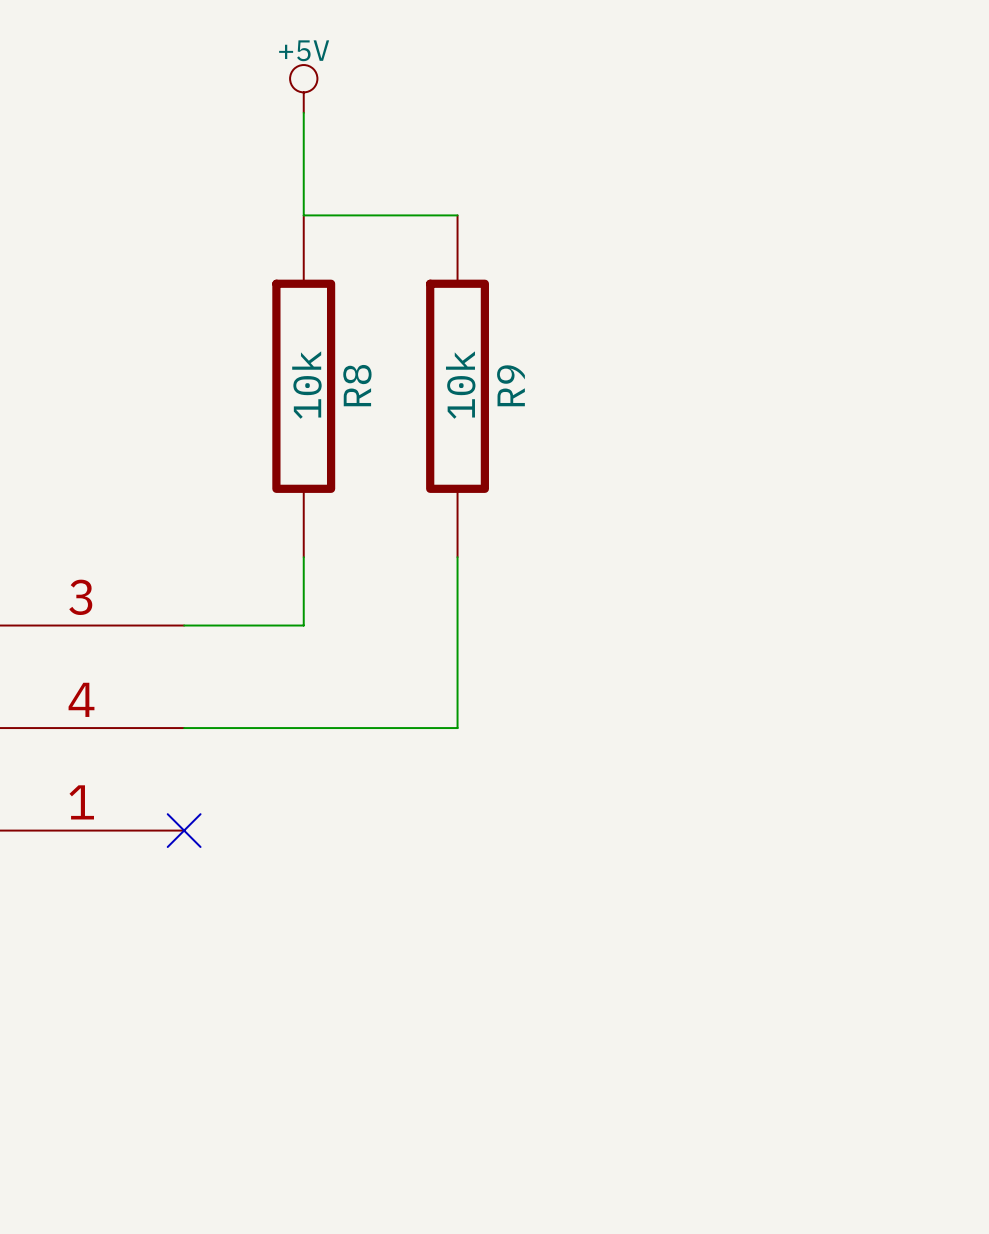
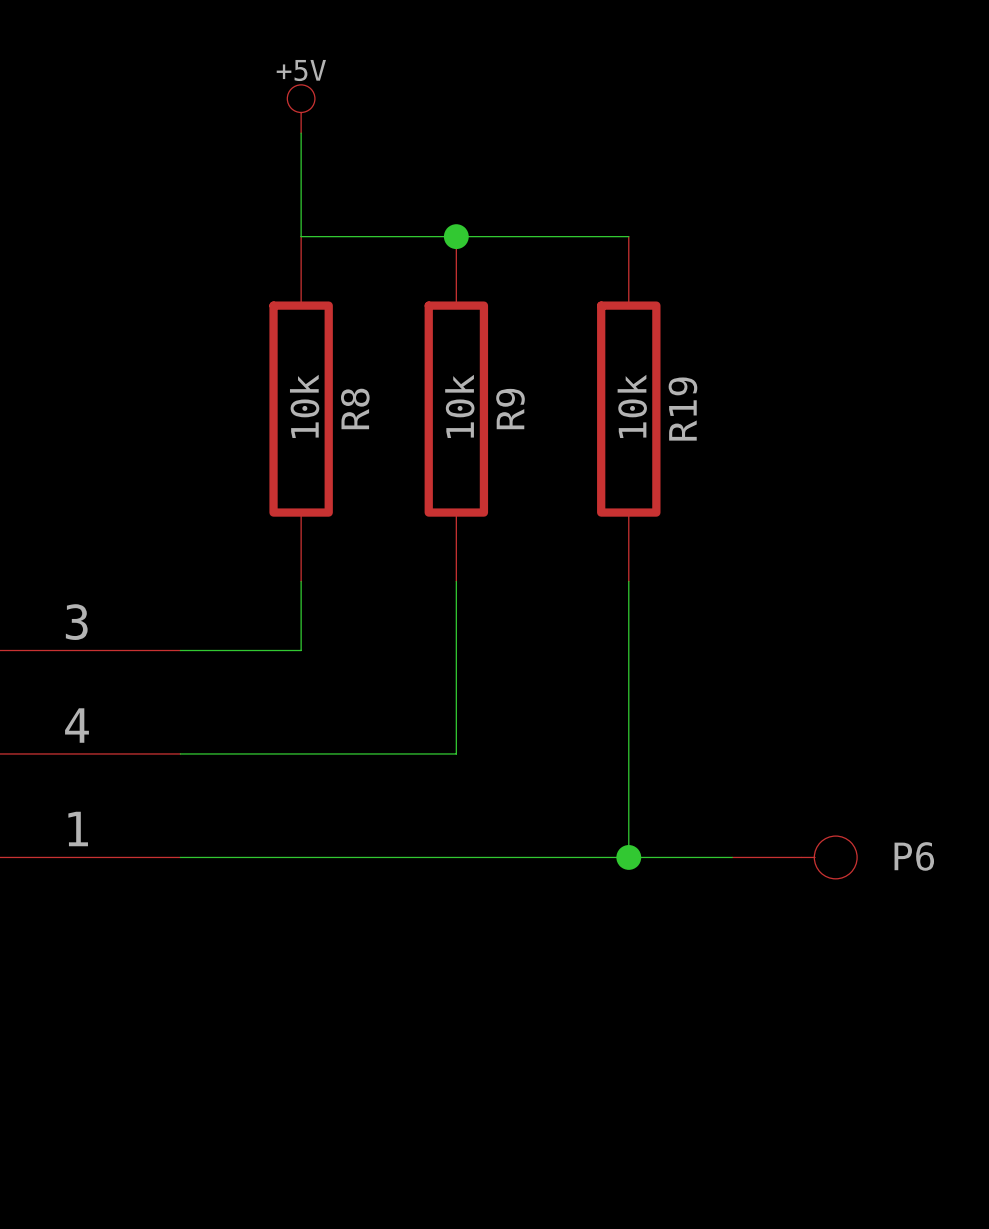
wire: none -> (456, 236) (628, 236)
junction: none -> (456, 236)
R19: none -> 10k (628, 409)
wire: none -> (628, 581) (628, 857)
wire: none -> (180, 857) (732, 857)
no-connect mark: (184, 830) -> none
junction: none -> (628, 857)
P6: none -> (794, 857)

